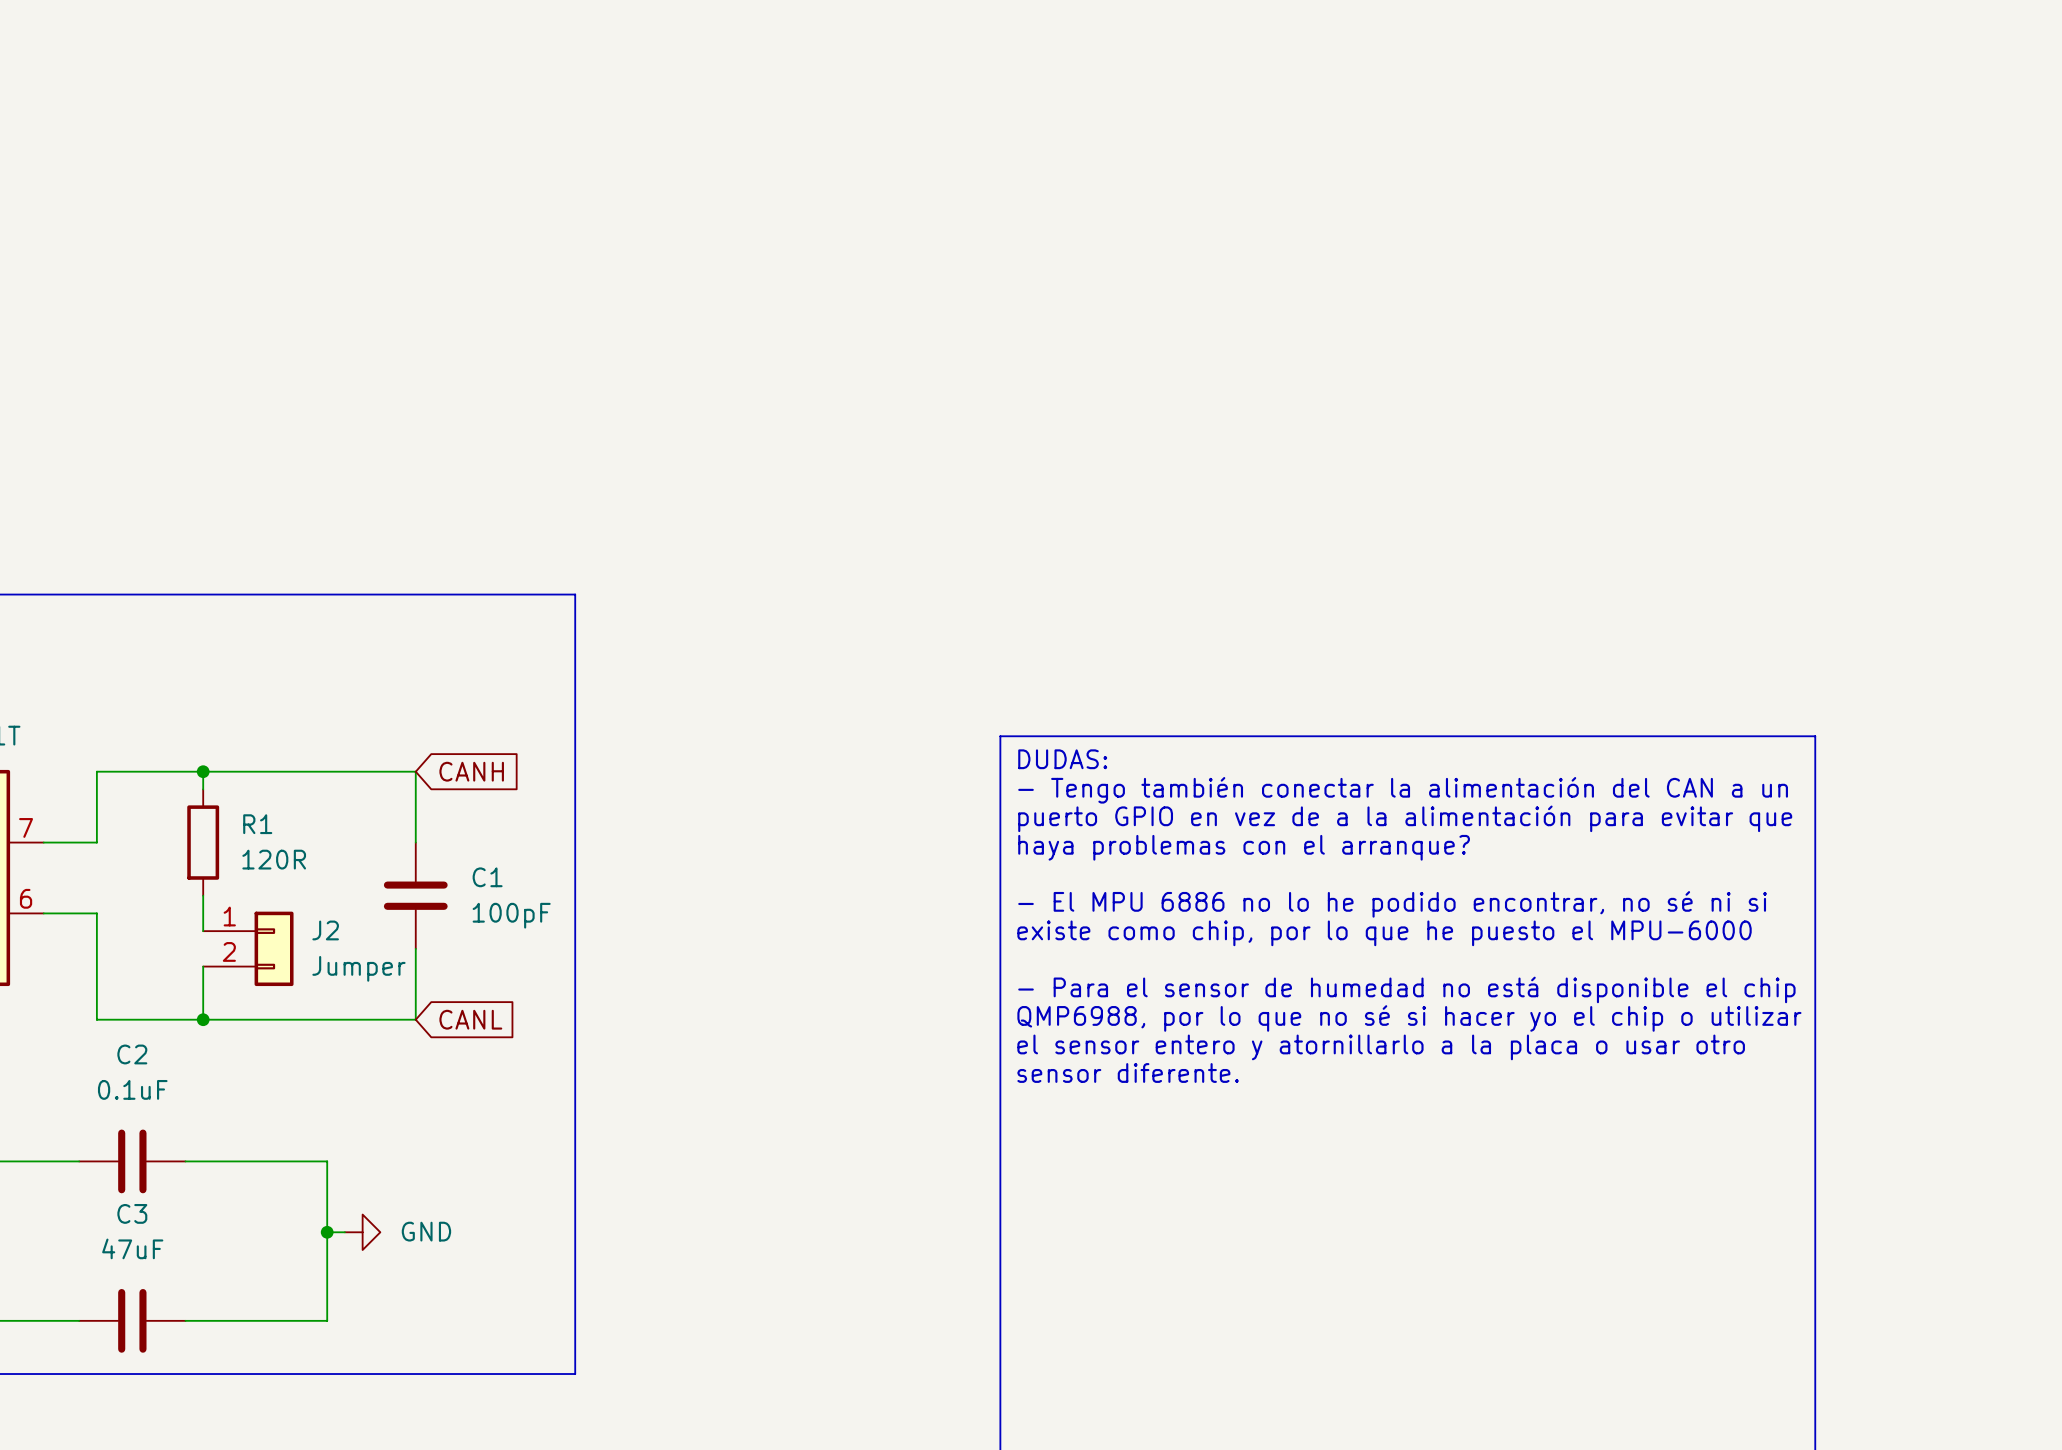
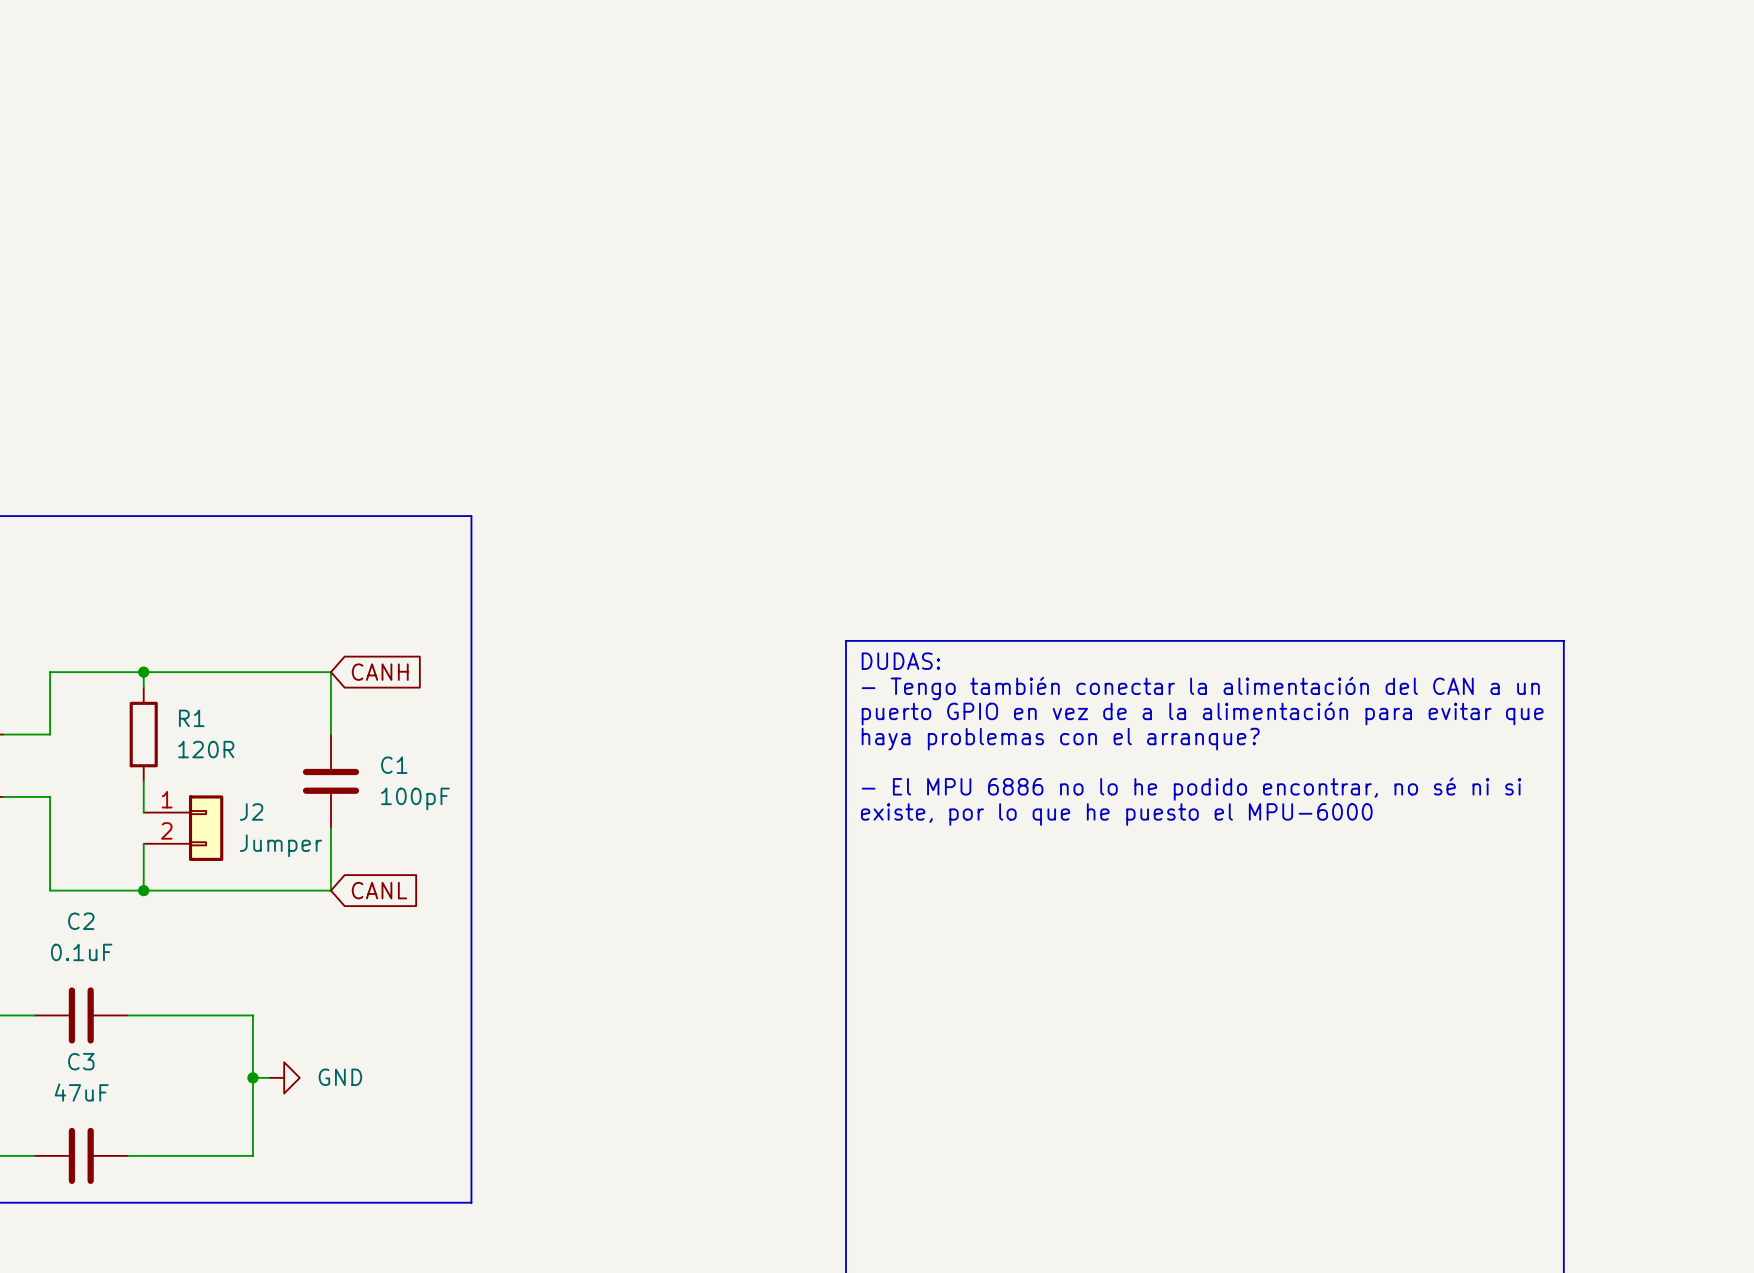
text: existe como chip, por lo que he puesto el MPU-6000 (1384, 933) -> existe, por lo que he puesto el MPU-6000 (1116, 814)
text: - Para el sensor de humedad no está disponible el chip (1406, 989) -> none
text: QMP6988, por lo que no sé si hacer yo el chip o utilizar (1409, 1018) -> none
text: el sensor entero y atornillarlo a la placa o usar otro (1381, 1047) -> none
text: sensor diferente. (1128, 1072) -> none

